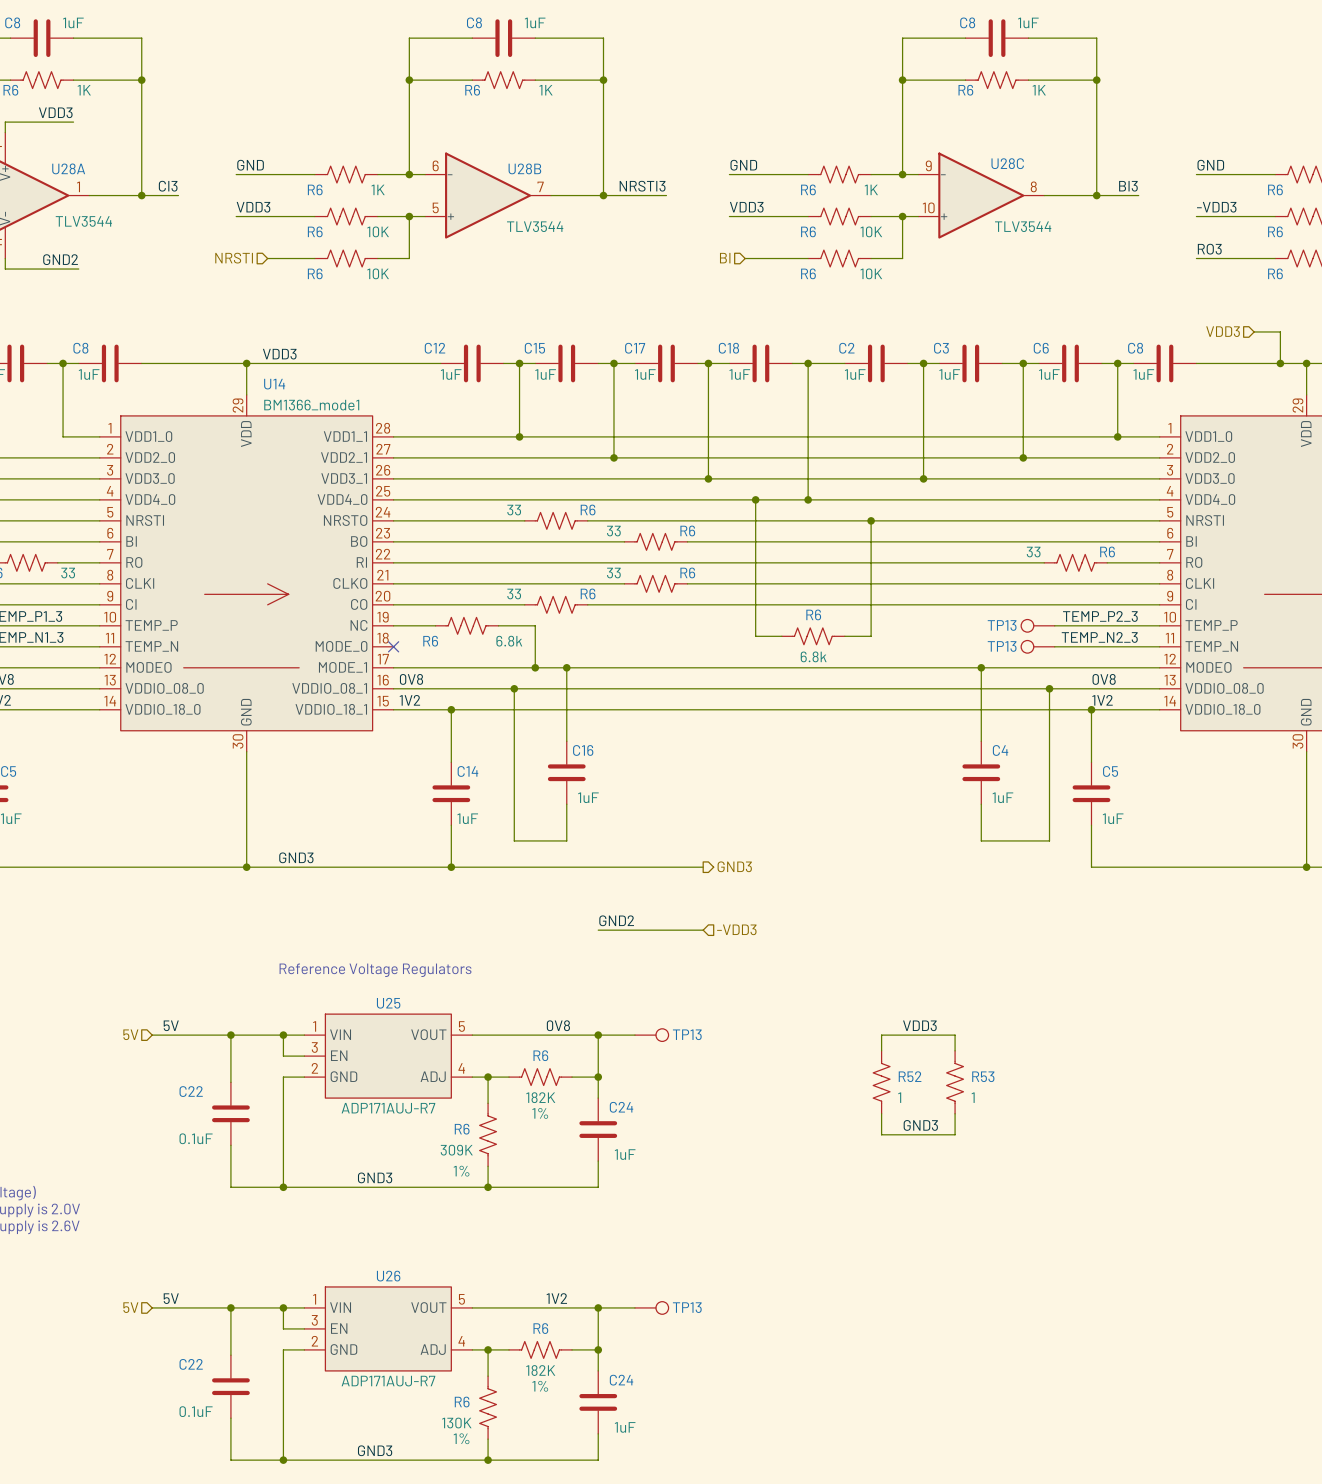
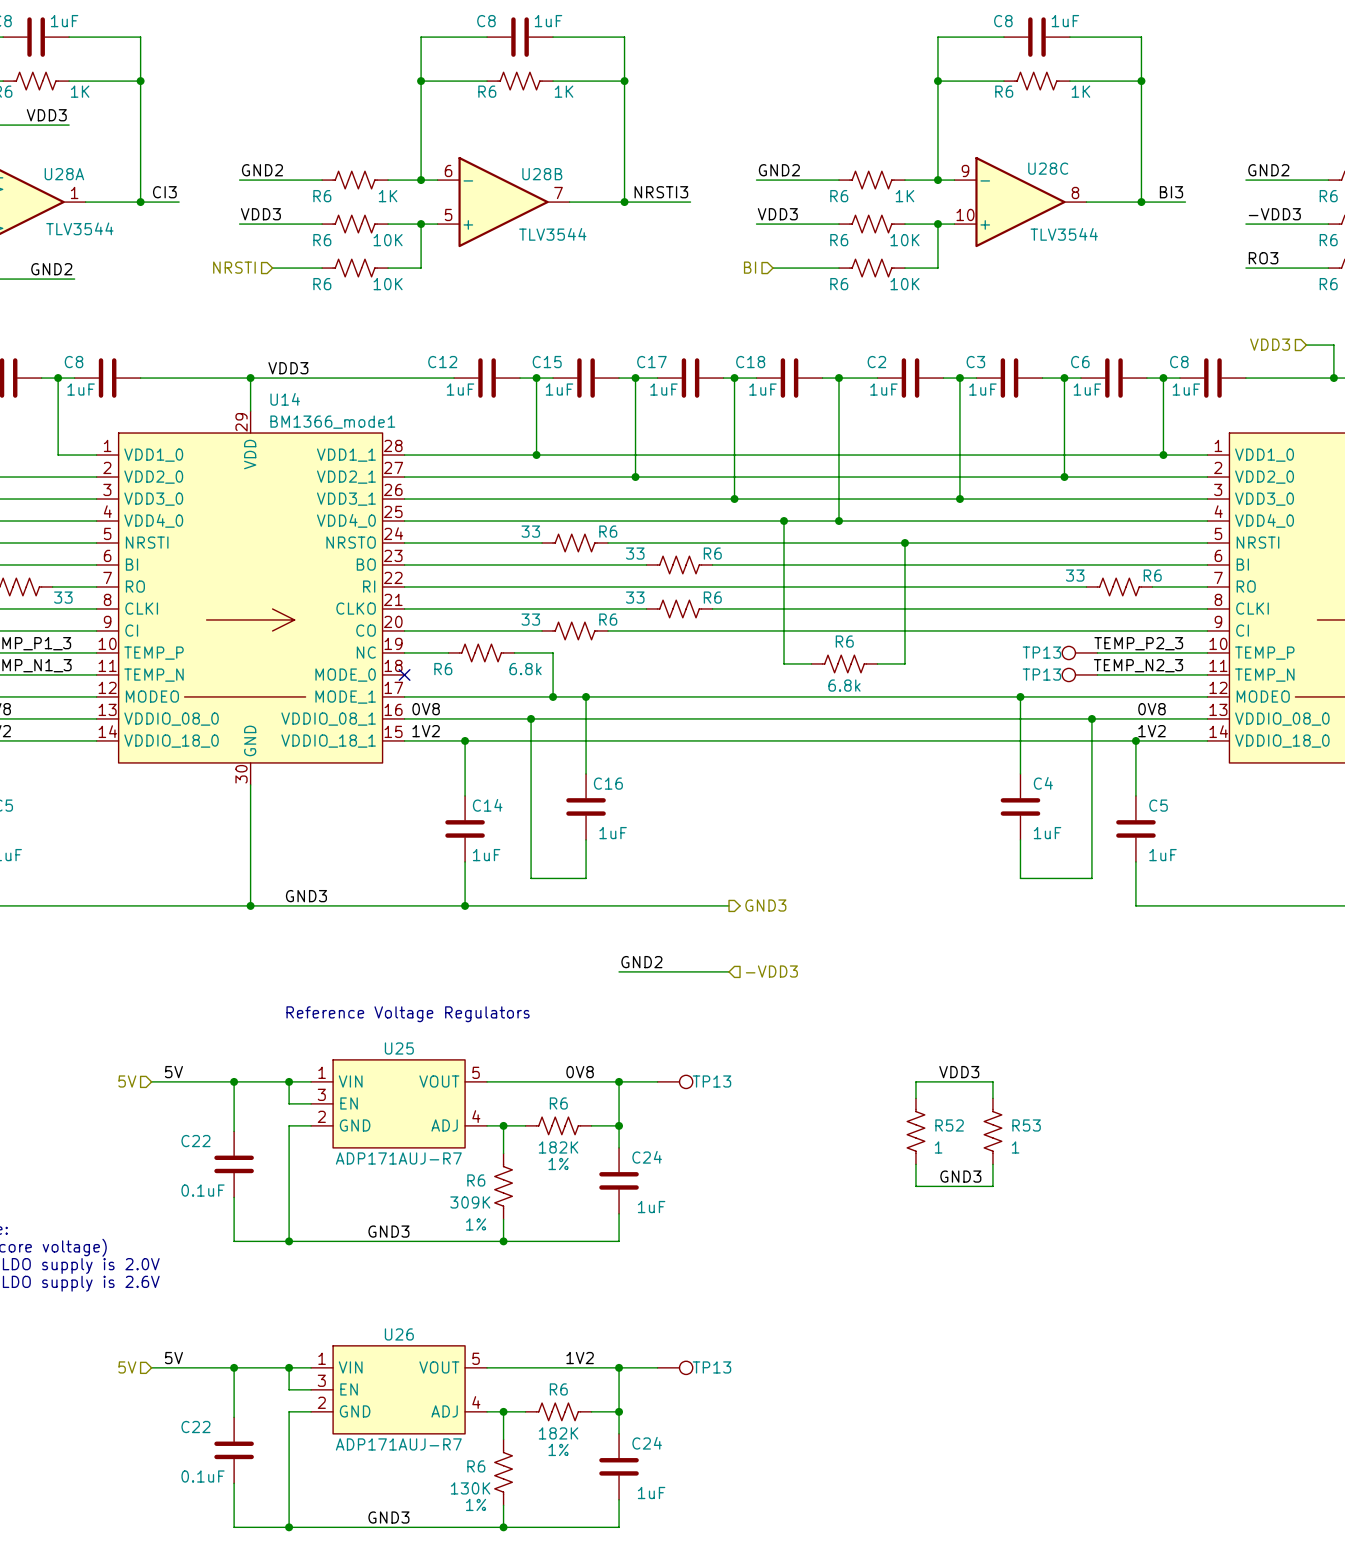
label: GND (250, 165) -> GND2 (262, 170)
label: GND (743, 165) -> GND2 (779, 170)
label: GND (1210, 165) -> GND2 (1268, 170)

